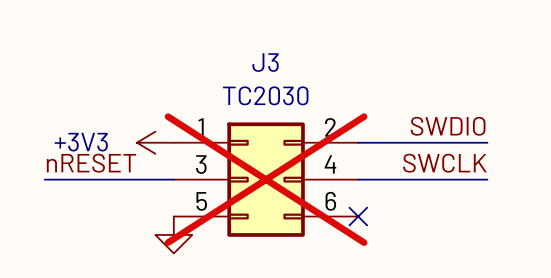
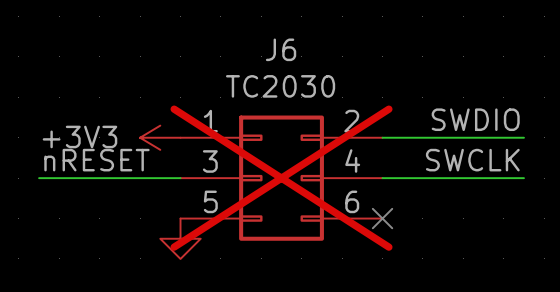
J3 name: J3 (265, 62) -> J6 (281, 49)

